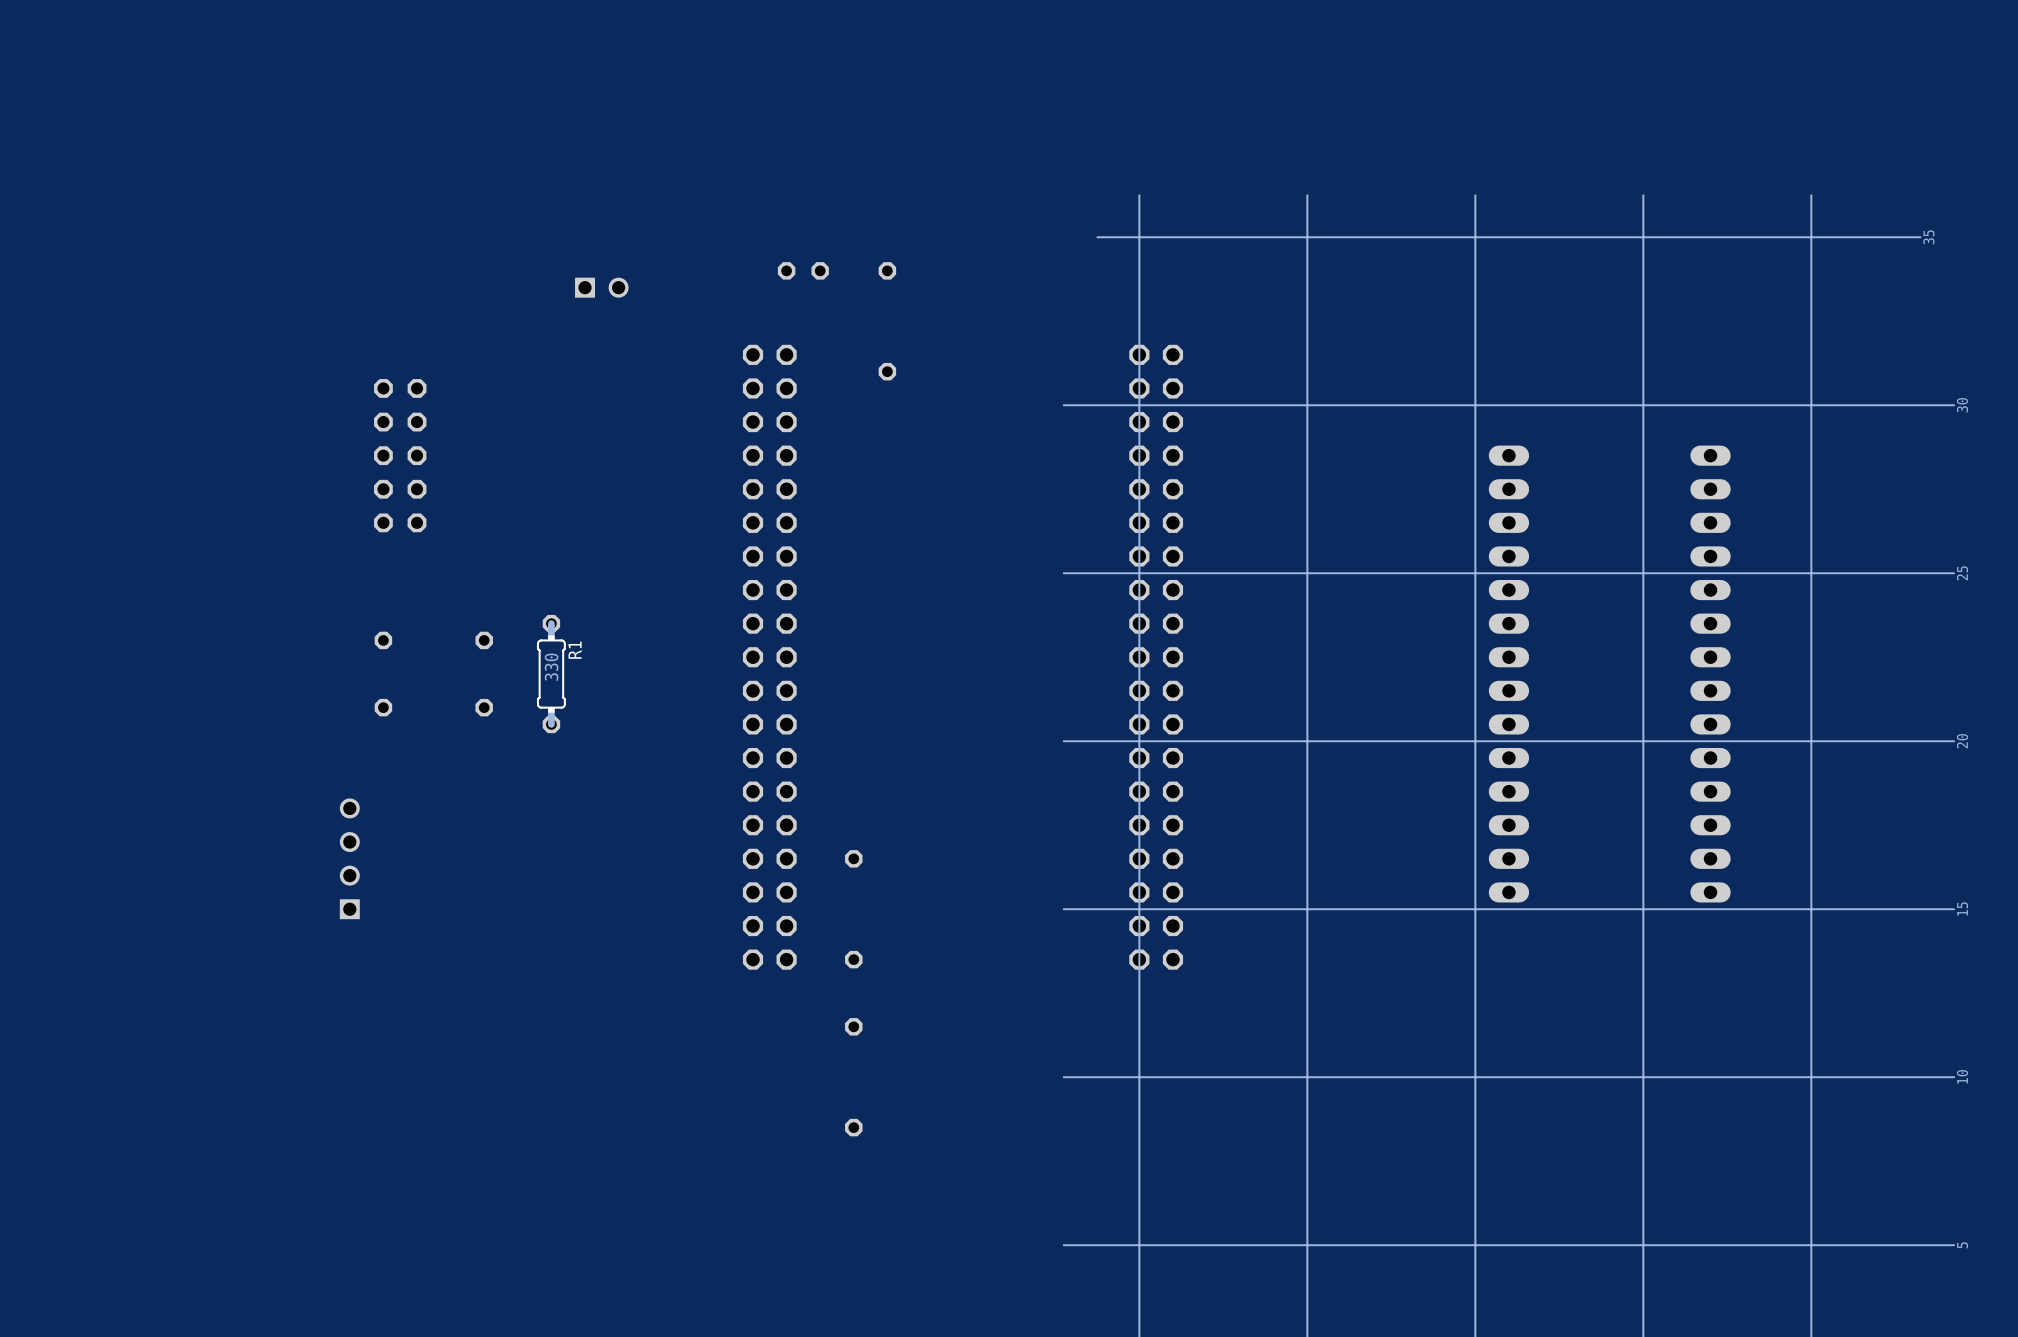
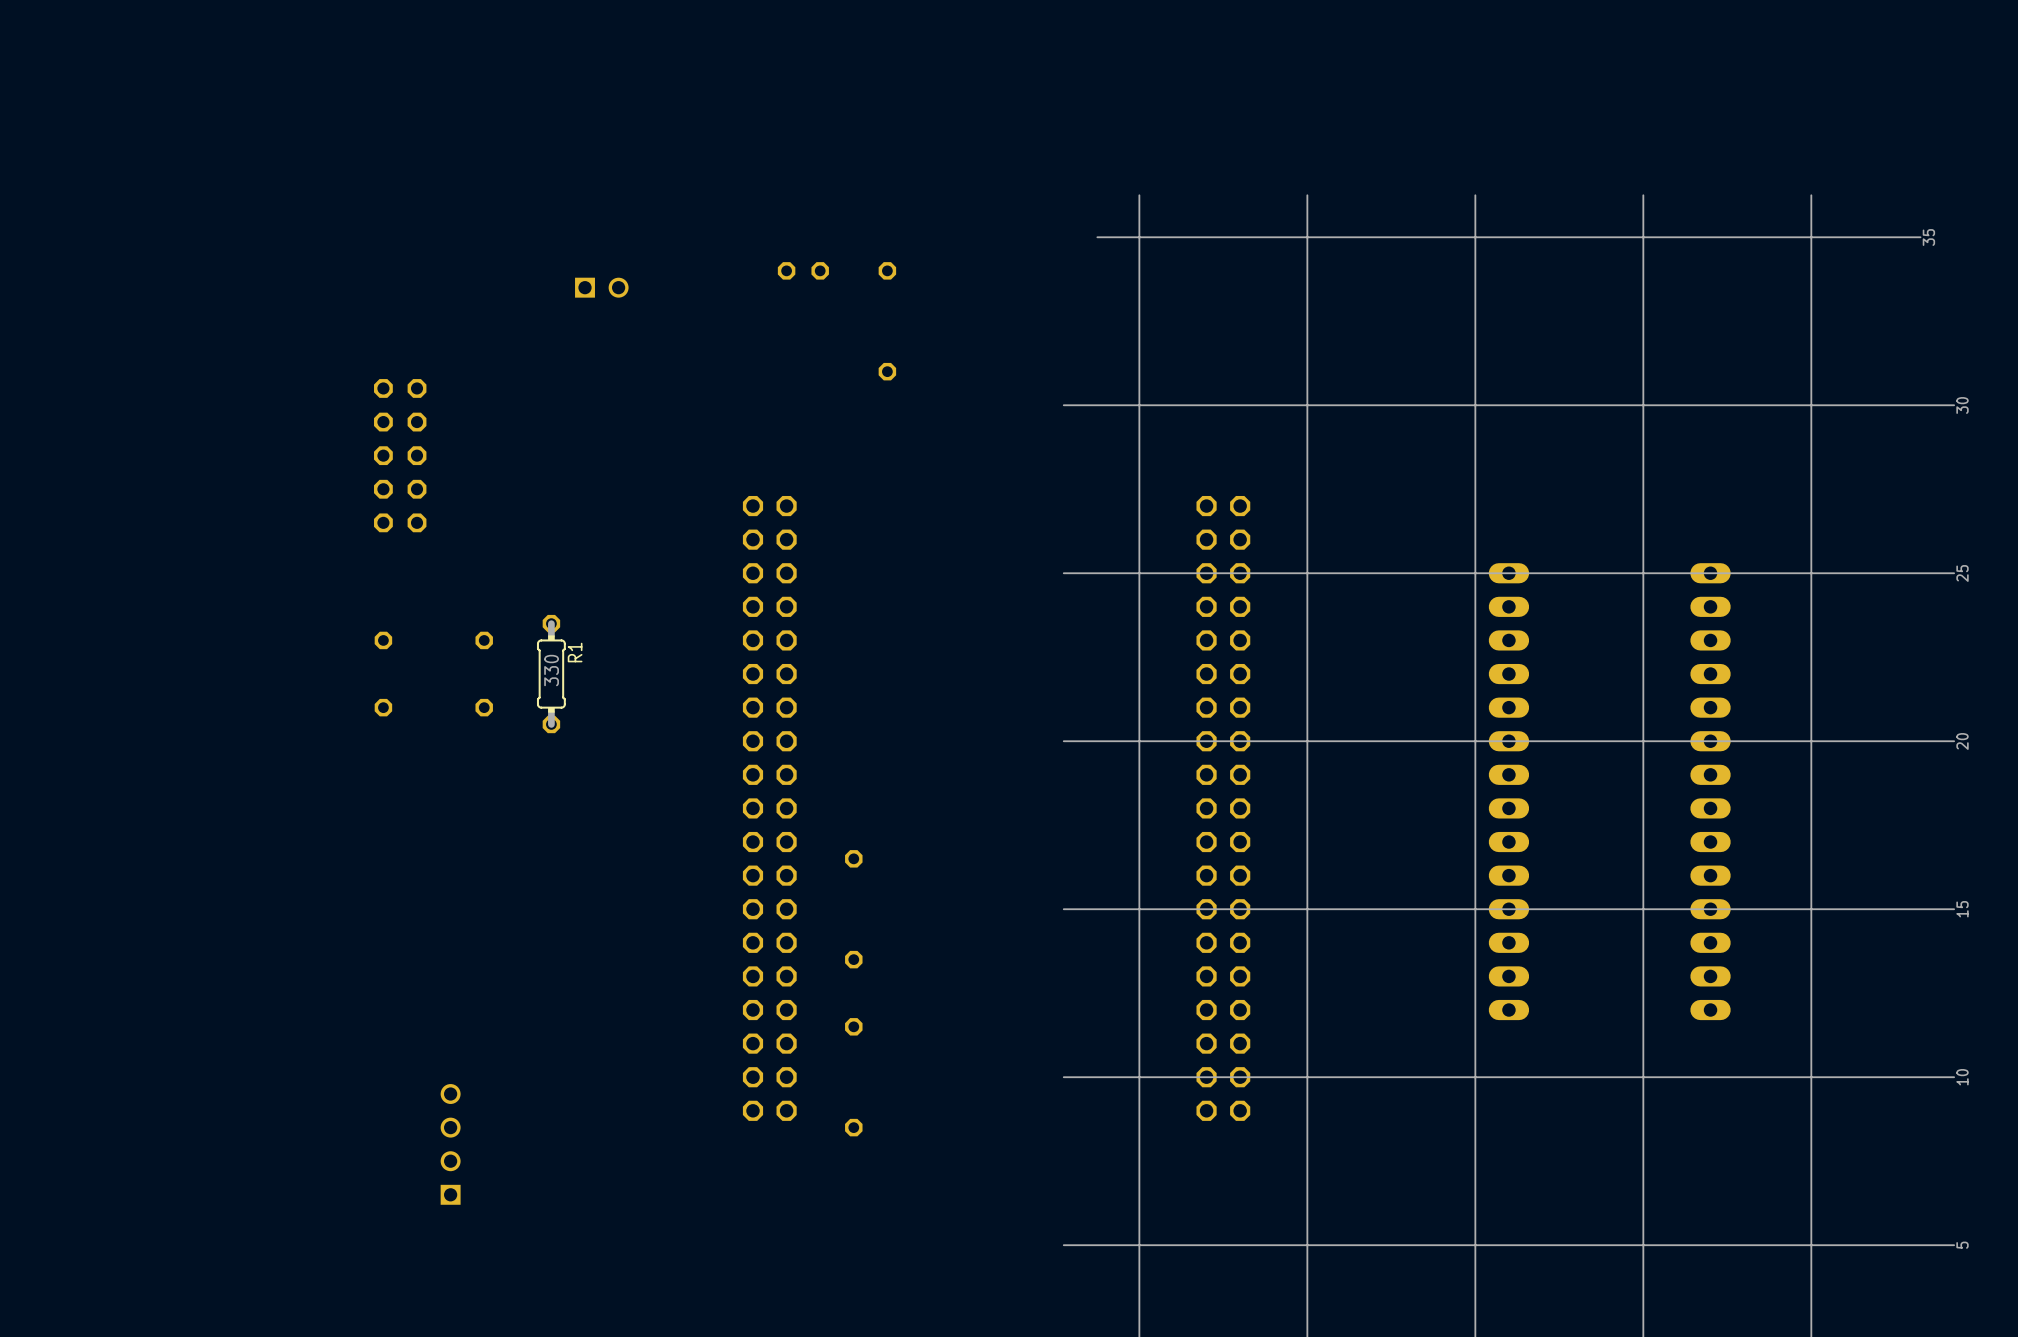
part position: (769, 657) -> (769, 808)
part position: (1156, 657) -> (1223, 808)
part: (1508, 674) -> none
part: (1710, 674) -> none
part: none -> (1508, 791)
part: none -> (1710, 791)
part position: (349, 858) -> (450, 1144)

